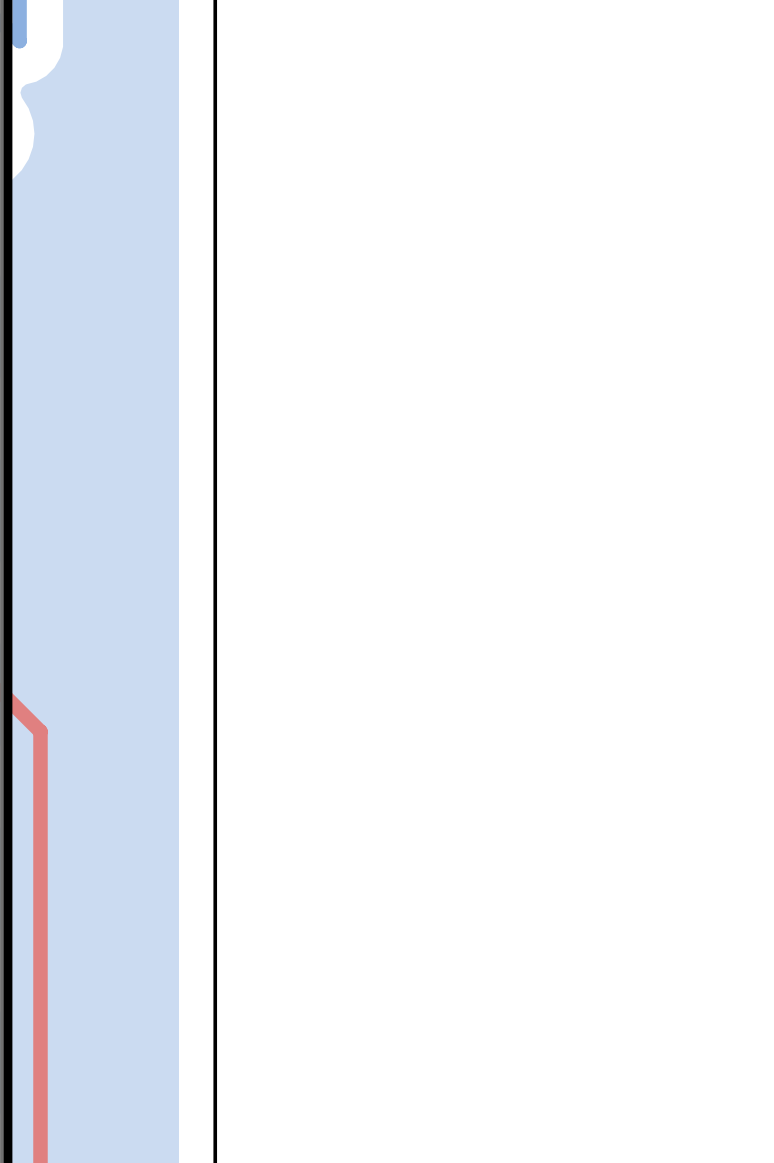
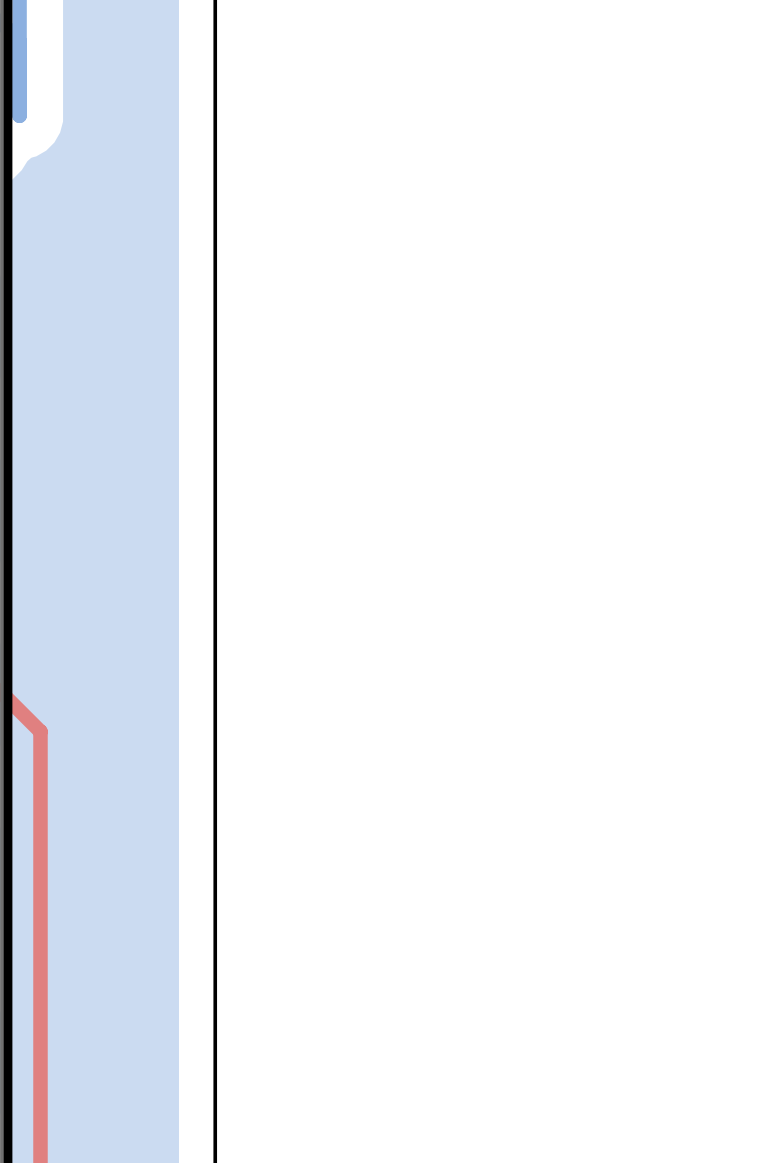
bottom track: none -> (19, 41) (19, 115)

